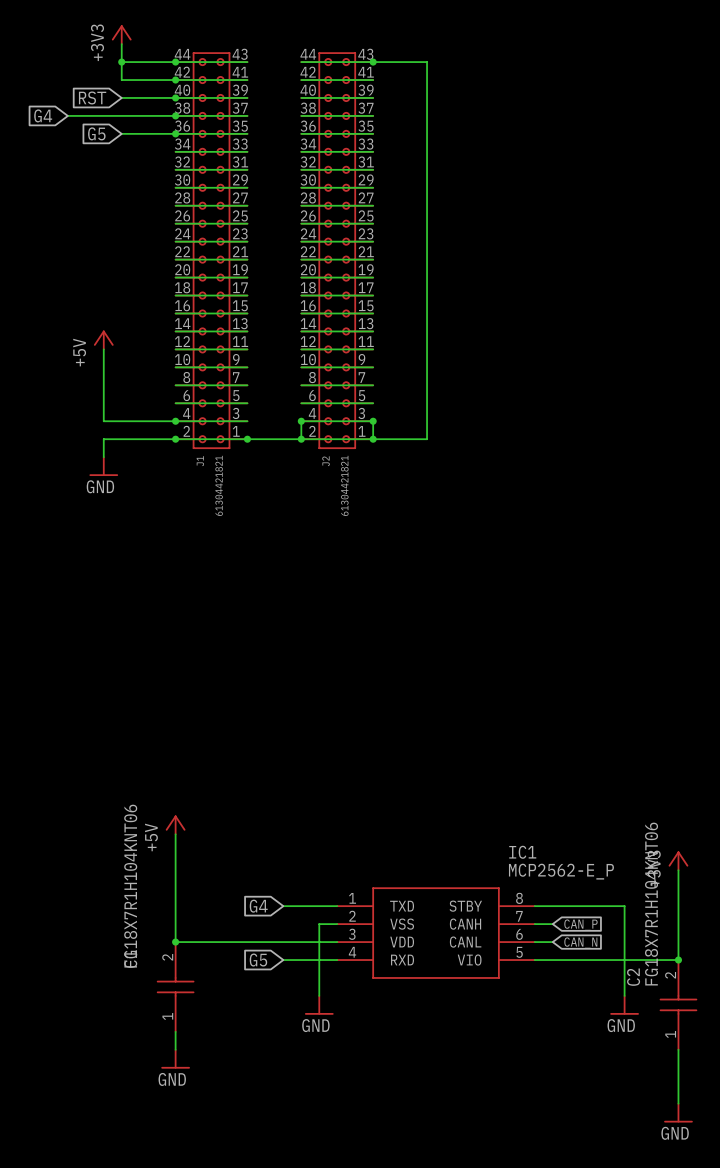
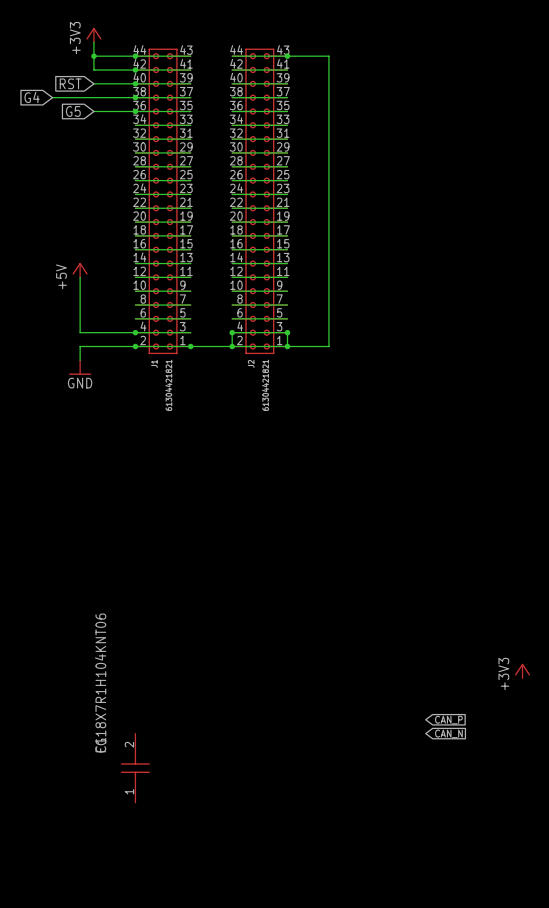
power symbol: +5V (175, 824) -> none
wire: (175, 834) (175, 942) (337, 942) -> none
wire: (678, 870) (678, 960) (534, 960) -> none
global label: G4 (258, 906) -> none
wire: (283, 906) (337, 906) -> none
wire: (534, 906) (624, 906) (624, 995) -> none
wire: (337, 924) (319, 924) (319, 995) -> none
wire: (534, 924) (552, 924) -> none
IC1: MCP2562-E_P (436, 933) -> none
junction: (175, 942) -> none
wire: (534, 942) (552, 942) -> none
global label: G5 (258, 960) -> none
wire: (283, 960) (337, 960) -> none
junction: (678, 960) -> none
C2: FG18X7R1H104KNT06 (678, 1004) -> none
power symbol: GND (319, 1005) -> none
power symbol: GND (624, 1005) -> none
wire: (175, 1031) (175, 1049) -> none
wire: (678, 1049) (678, 1103) -> none
power symbol: GND (175, 1059) -> none
power symbol: GND (678, 1113) -> none

